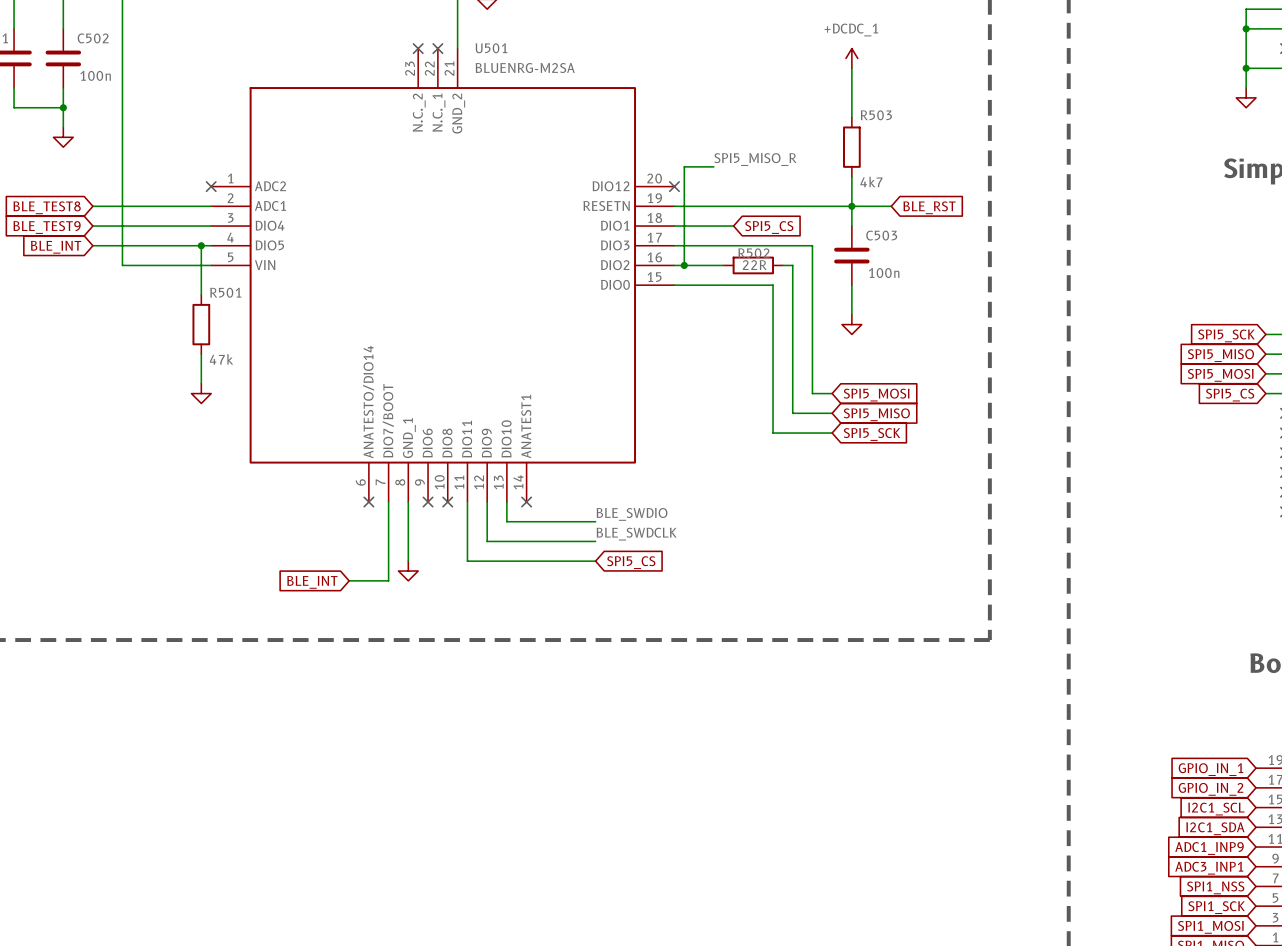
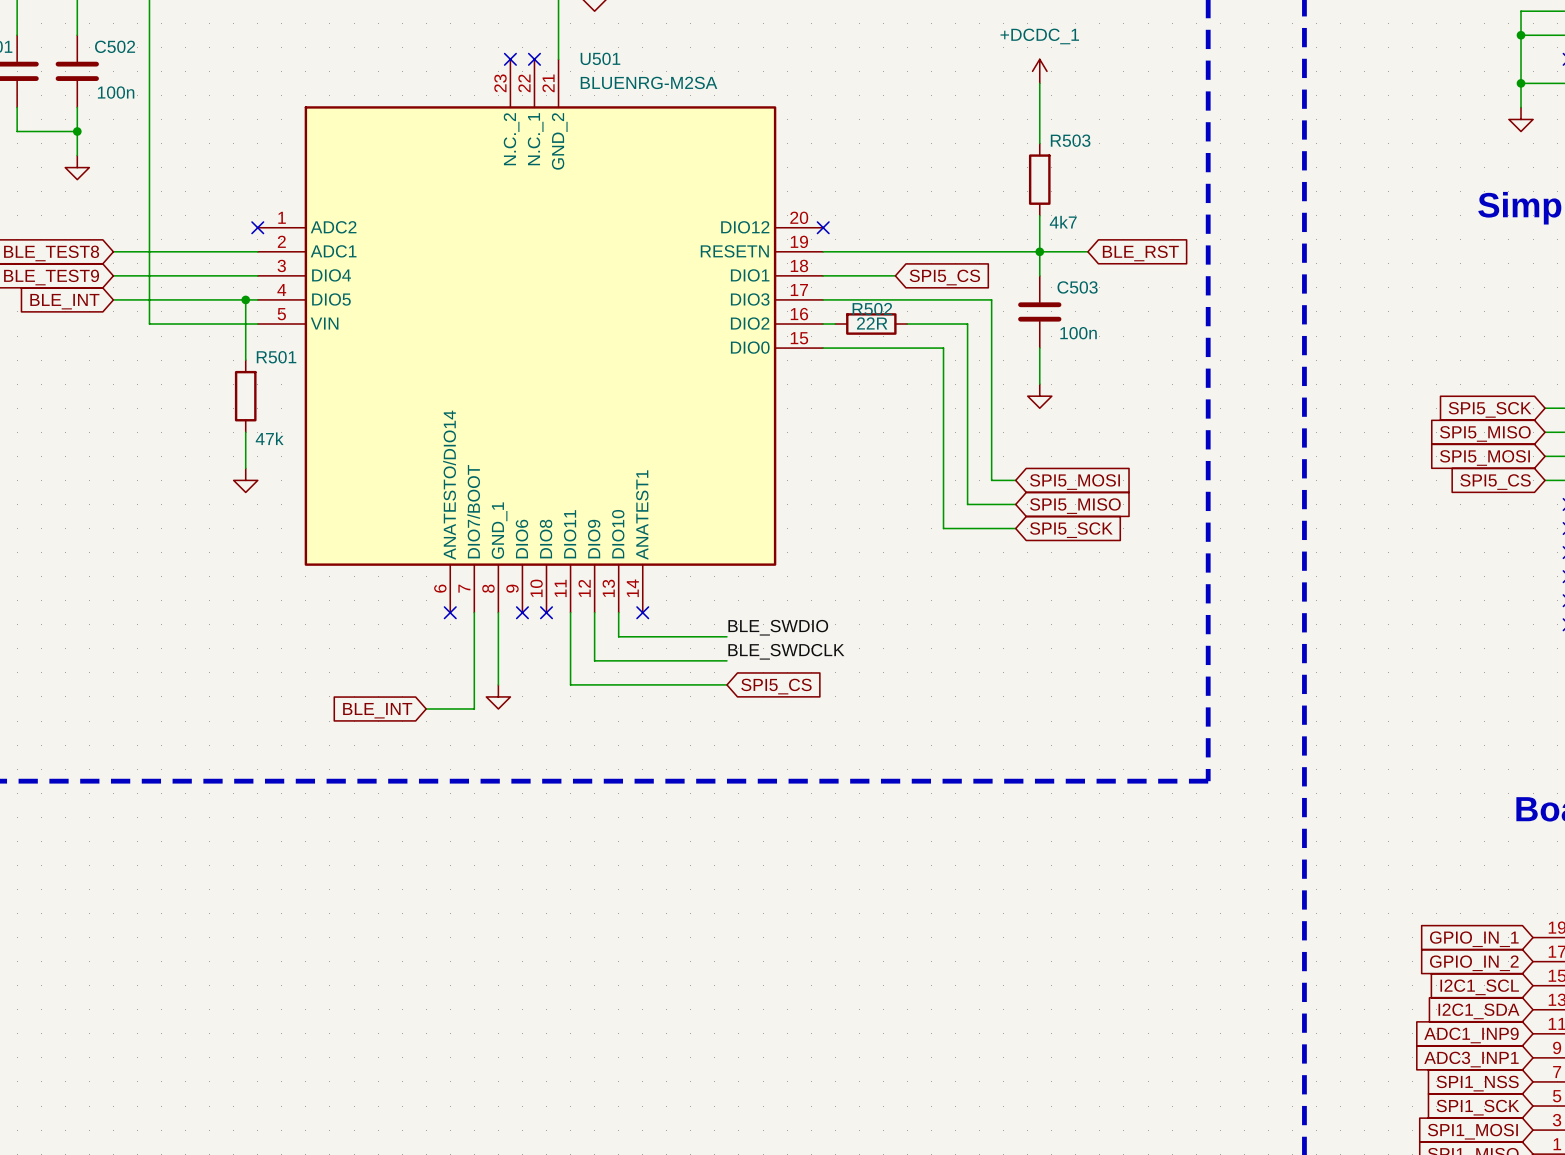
label: SPI5_MISO_R (755, 159) -> none
wire: (713, 166) (684, 166) (684, 265) (723, 265) -> none
junction: (684, 265) -> none
R502 position: (753, 265) -> (871, 324)

